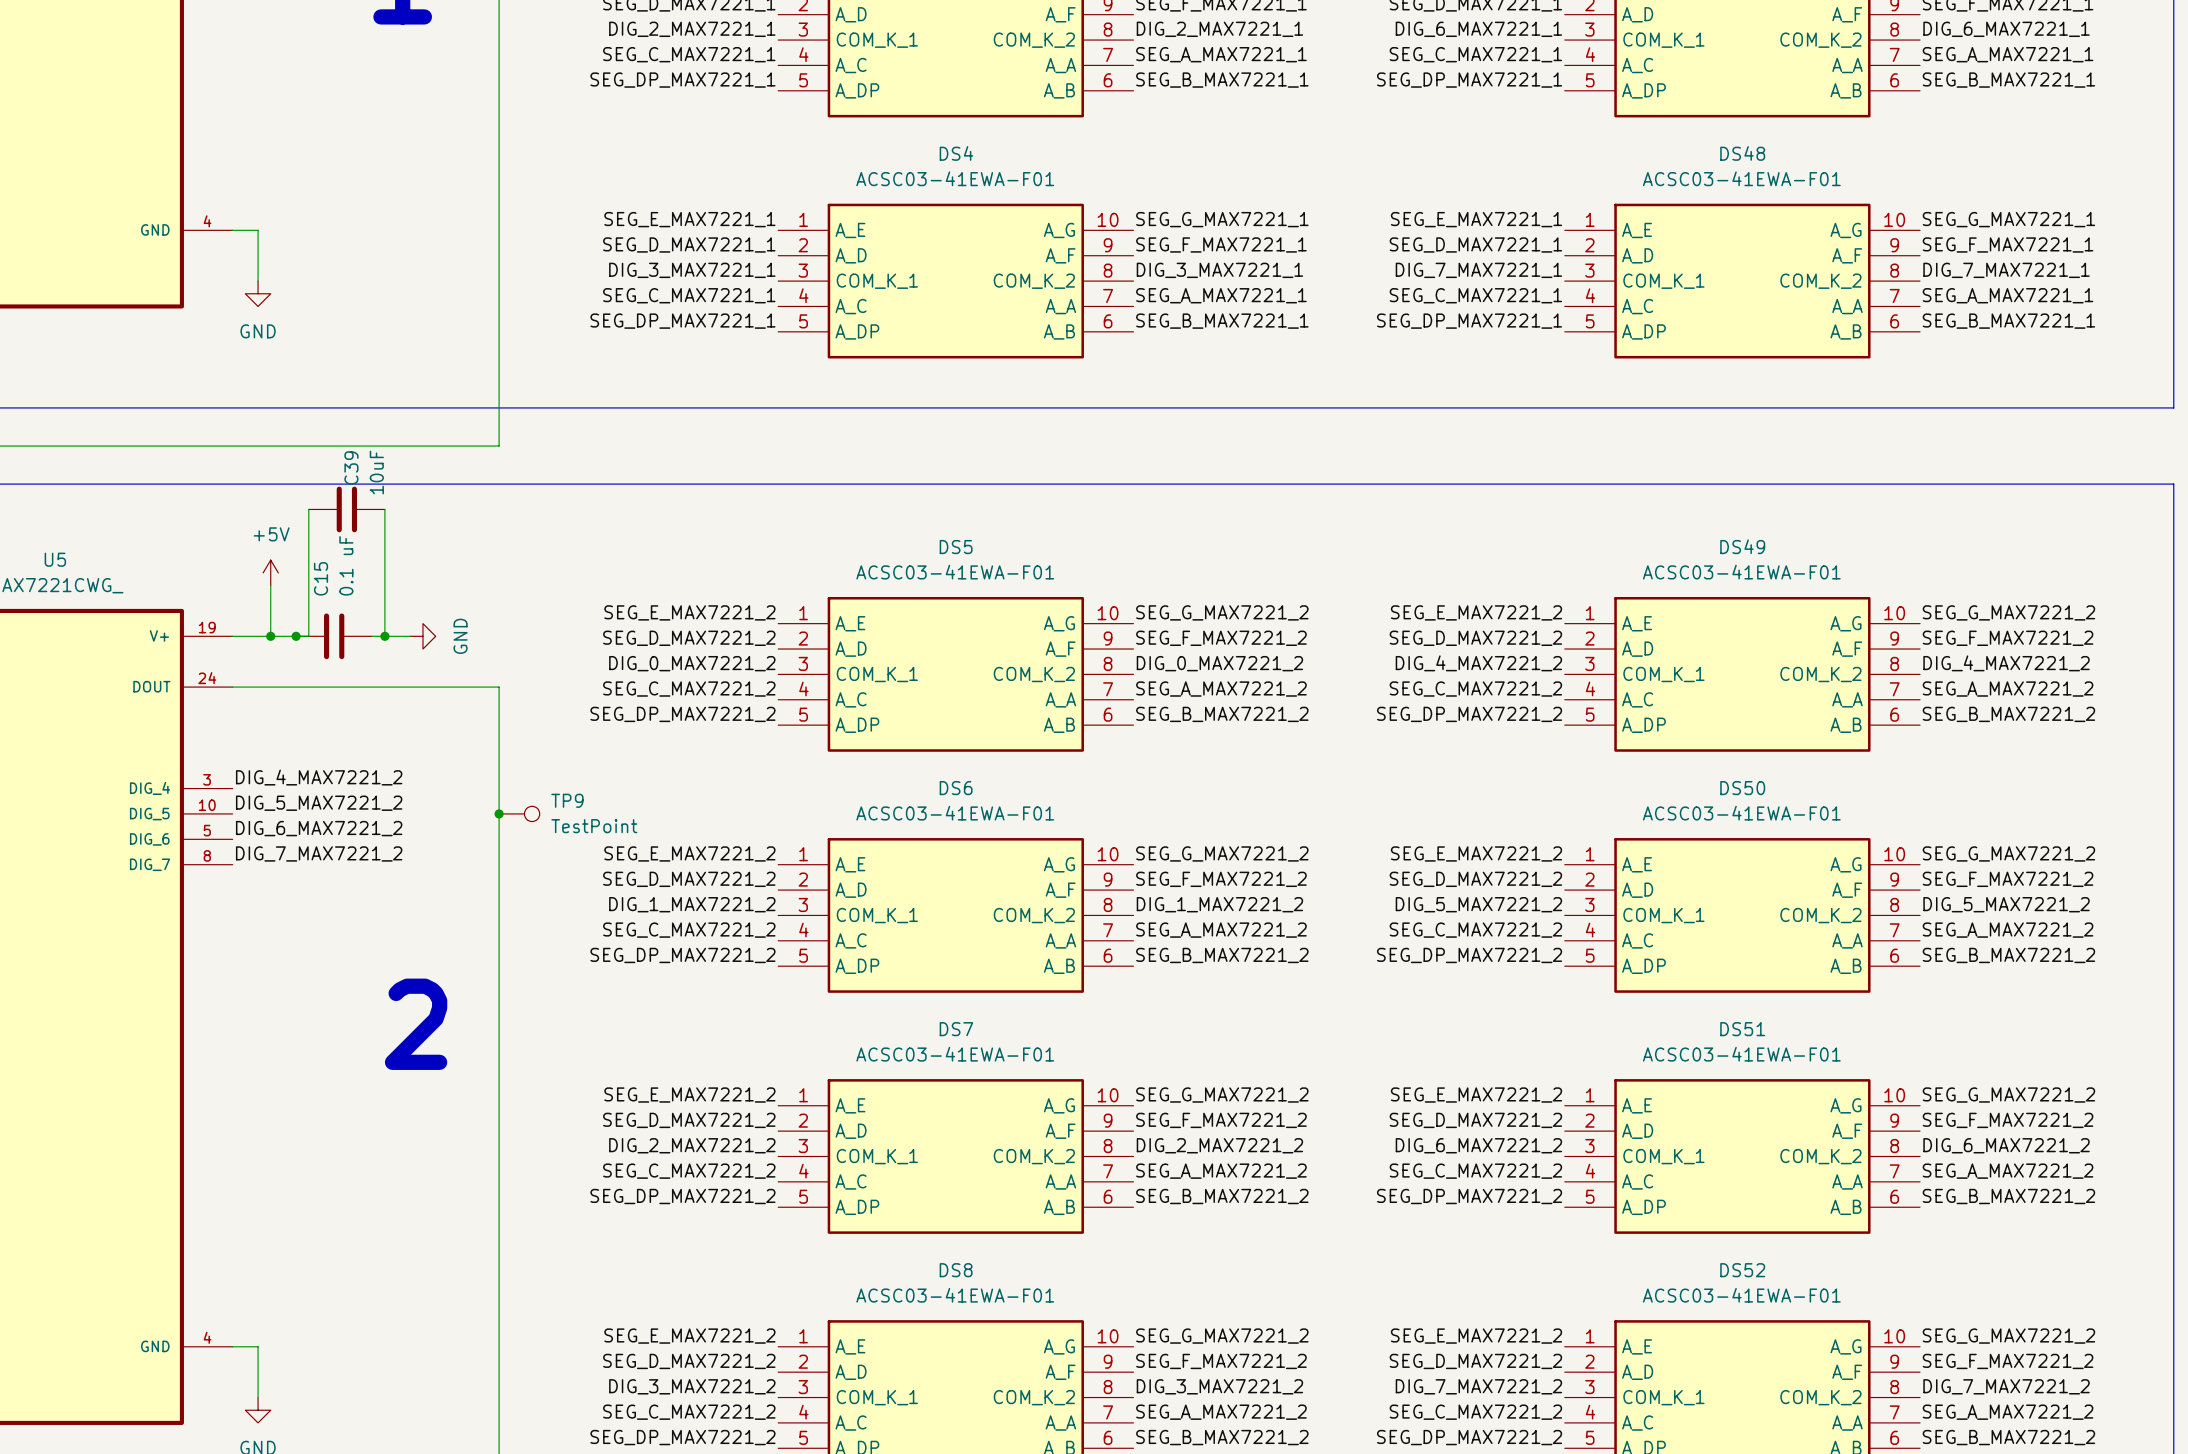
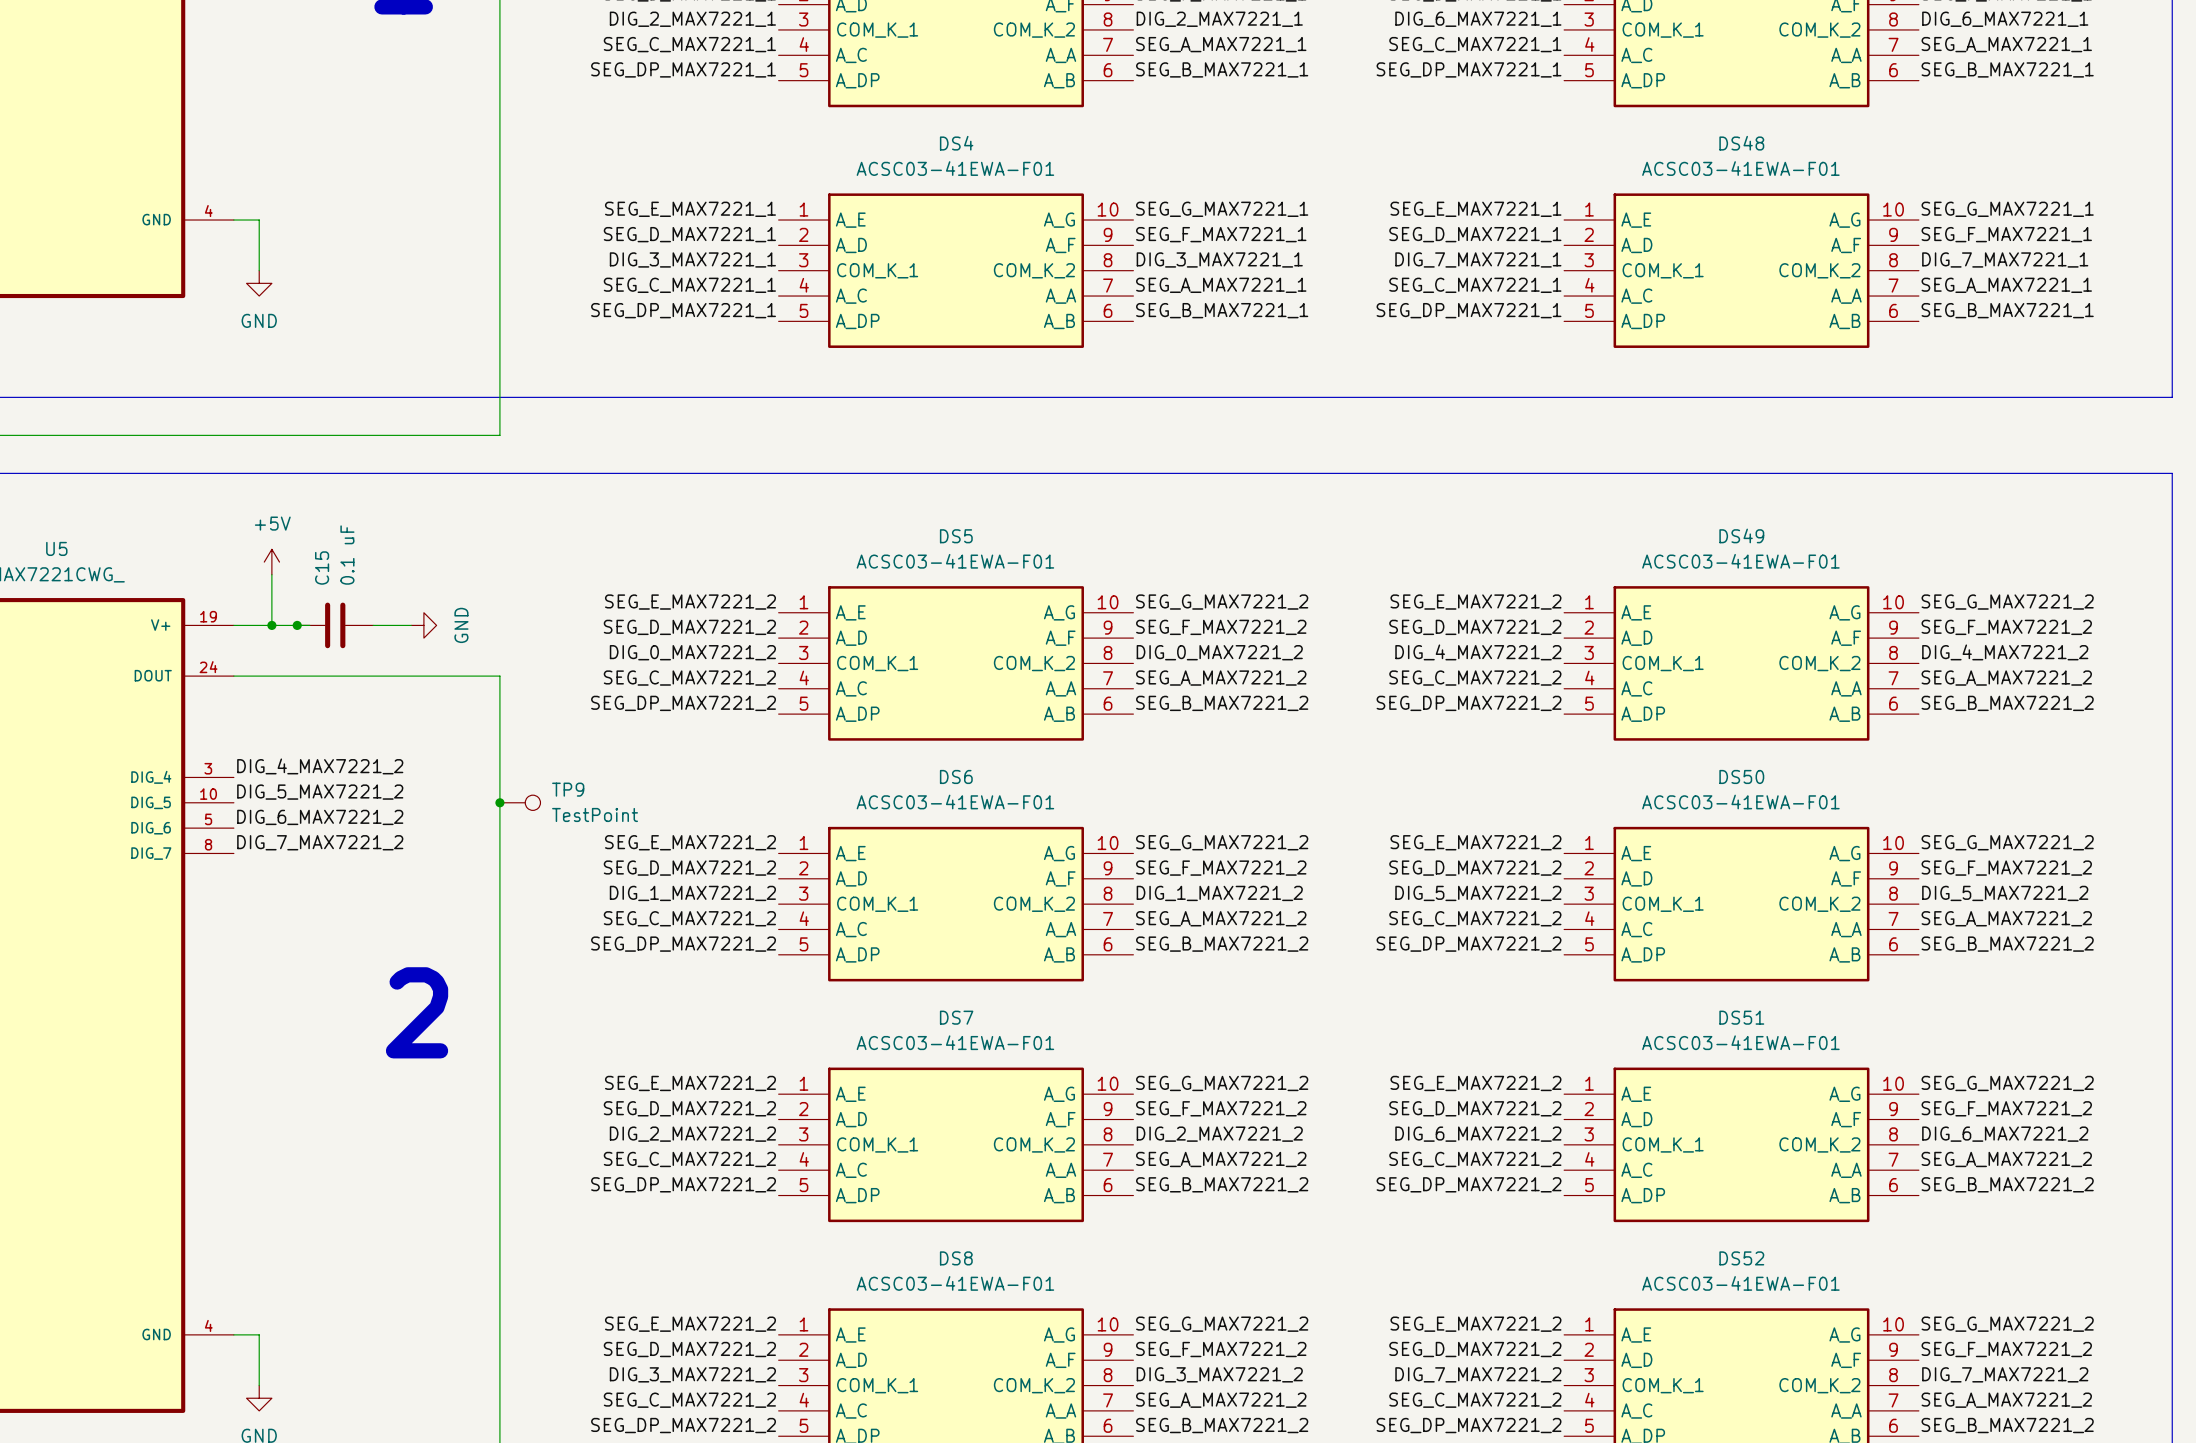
wire: (308, 509) (308, 636) -> none
C39: 10uF (346, 509) -> none
wire: (384, 509) (384, 636) -> none
junction: (384, 636) -> none

